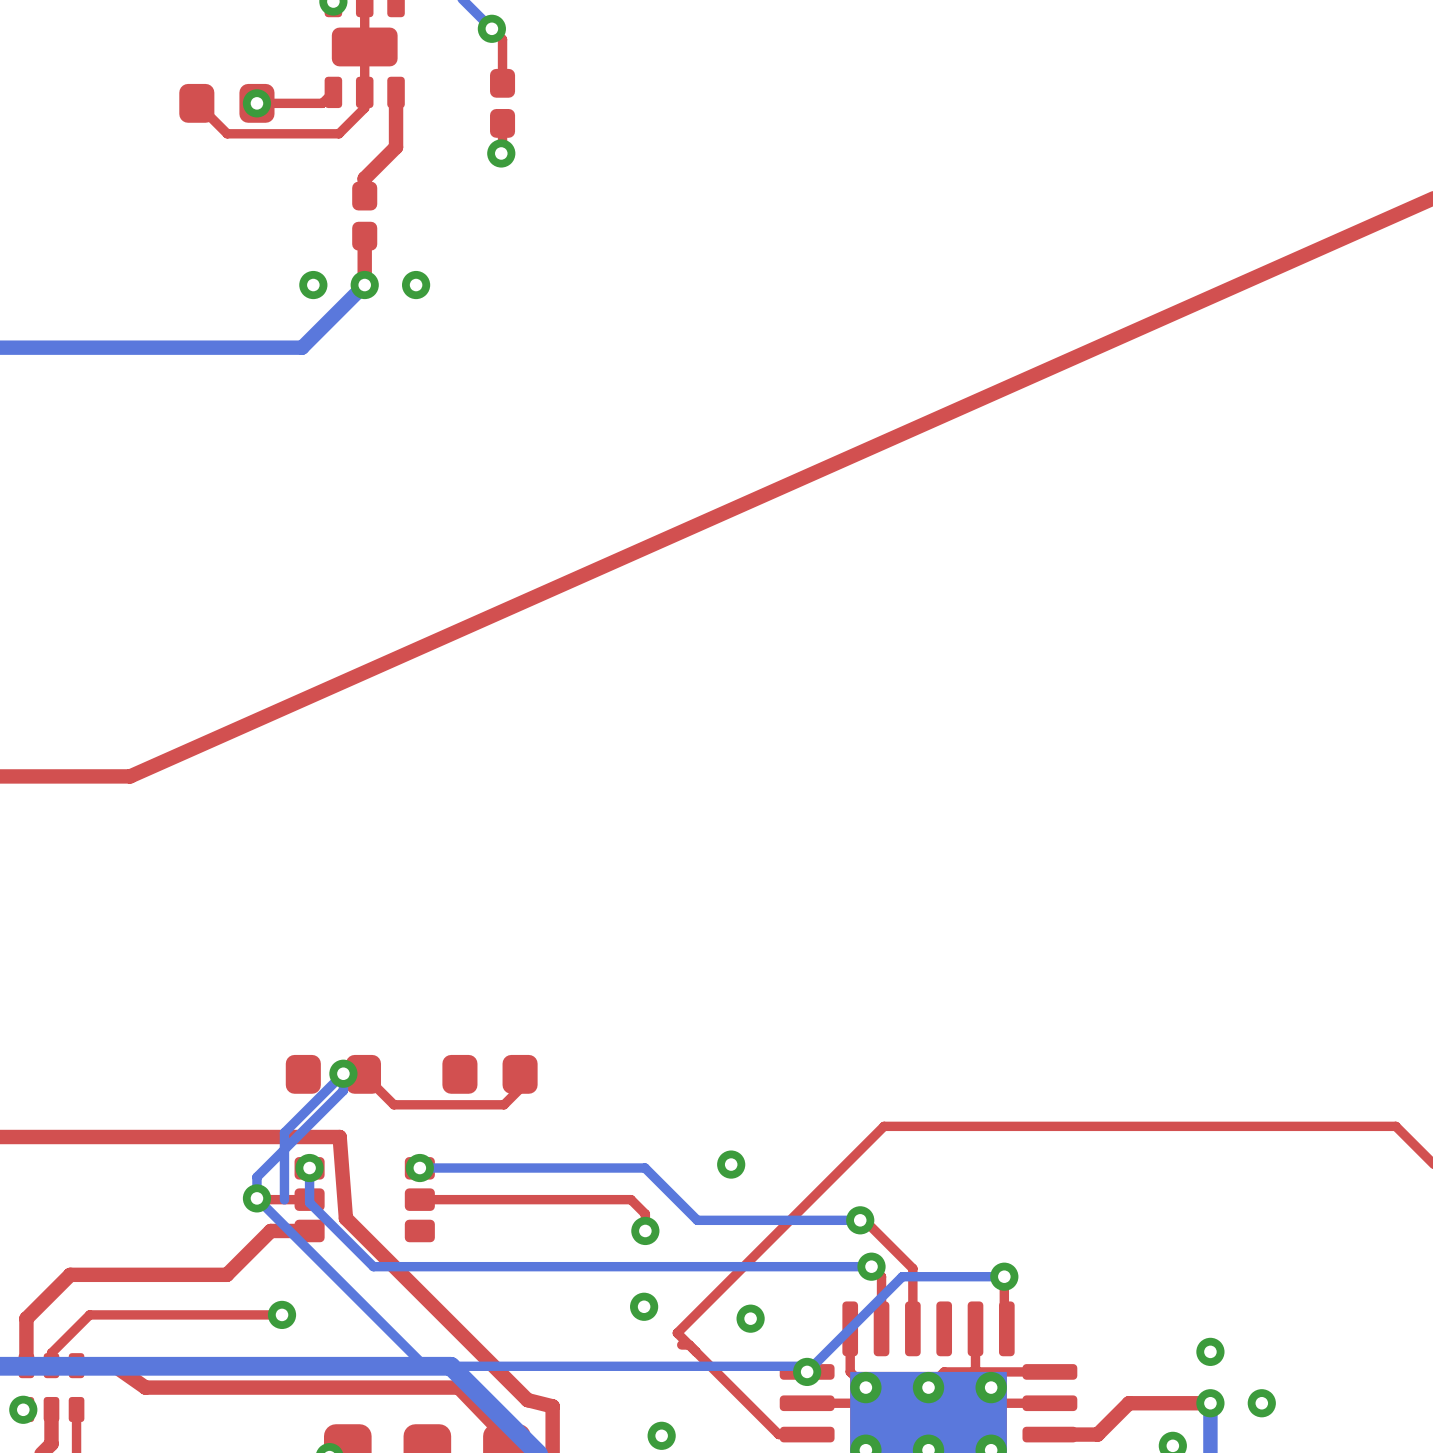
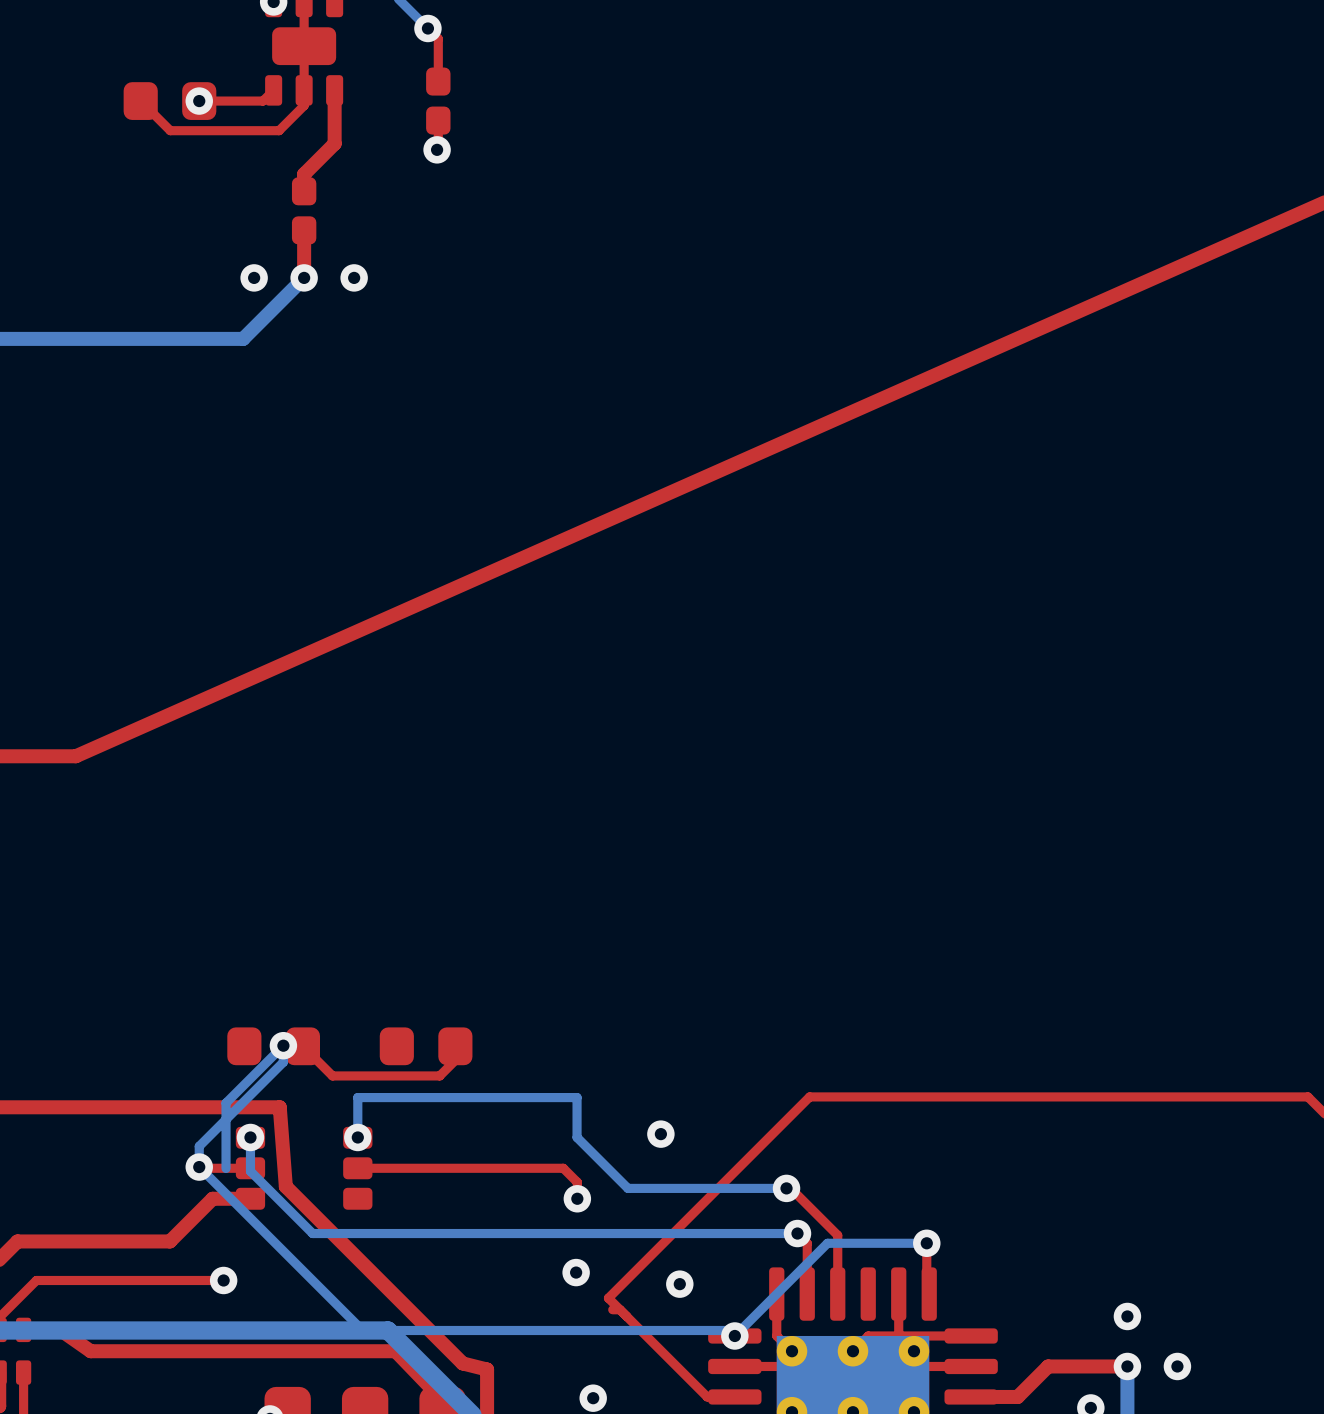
bottom track: (645, 1168) (419, 1168) -> (577, 1137) (577, 1097) (357, 1097) (357, 1137)

